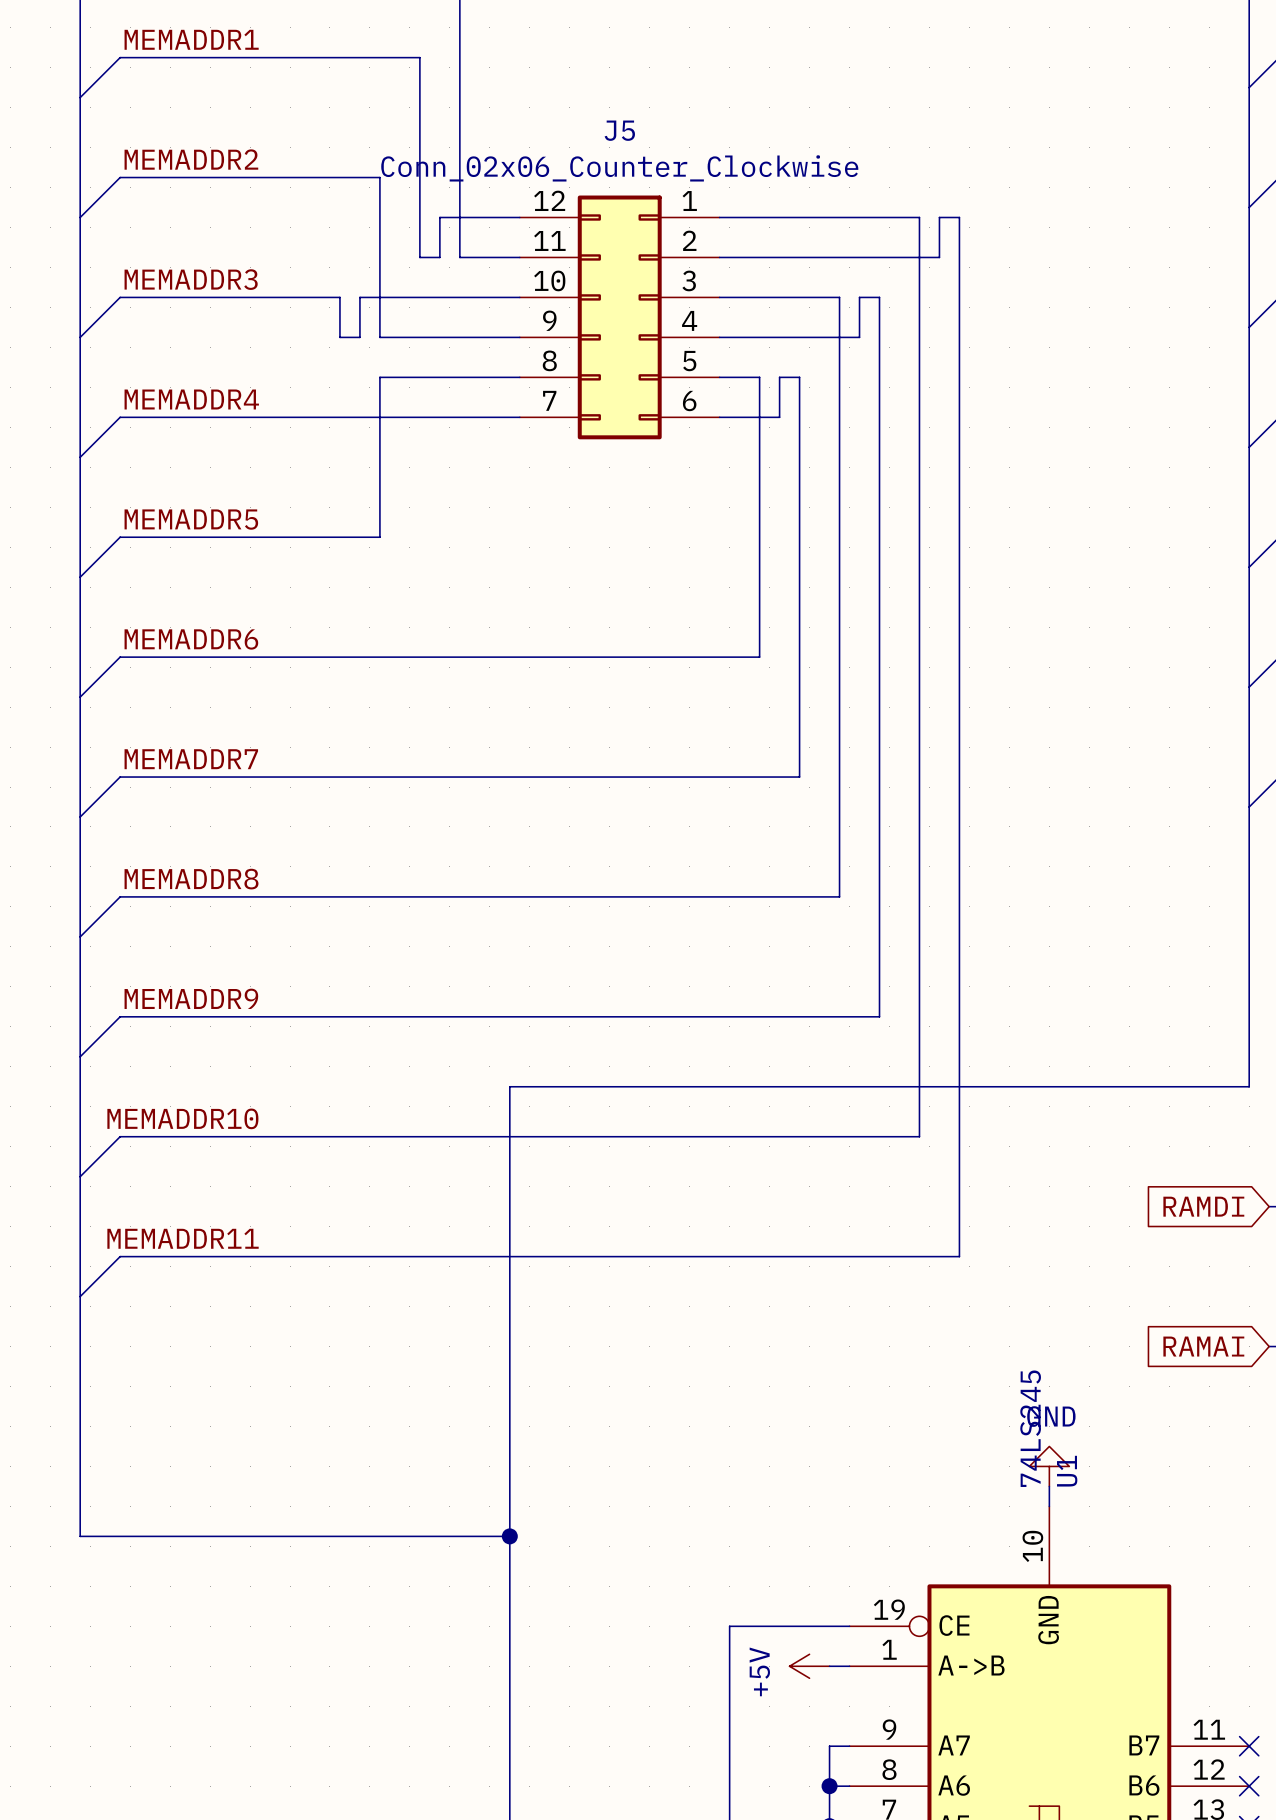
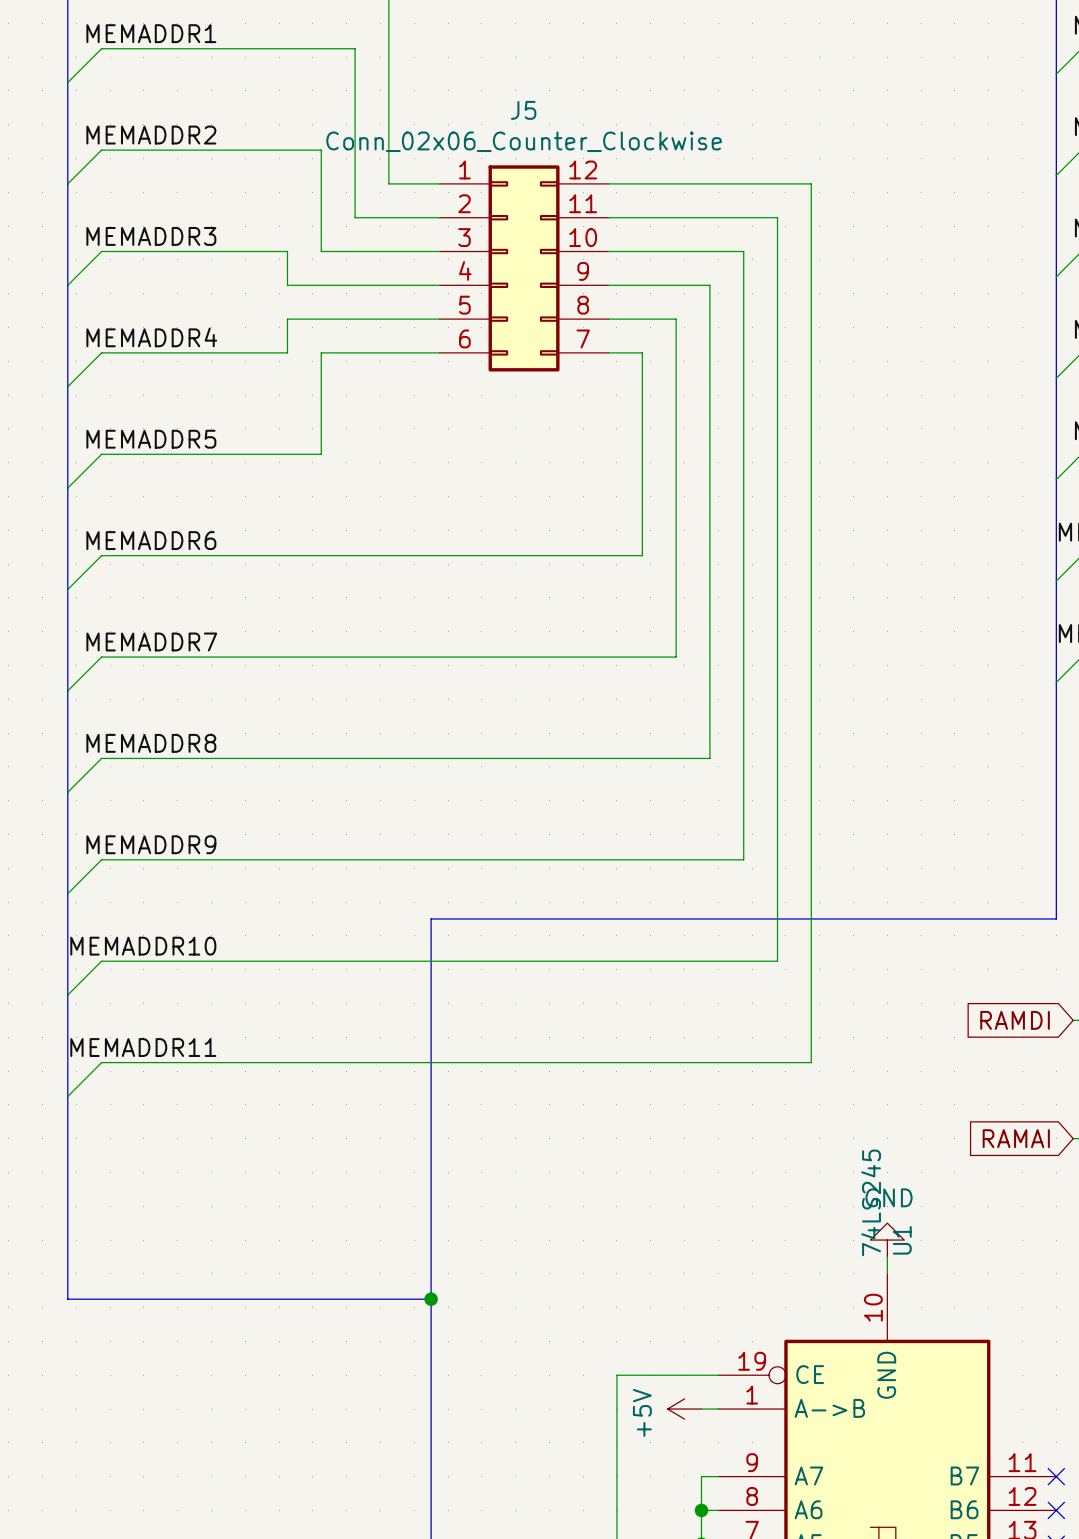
wire: (919, 217) (919, 257) (939, 257) (939, 217) -> (777, 183) (794, 183)
wire: (439, 257) (439, 217) (459, 217) (459, 257) -> (371, 217) (388, 217)
wire: (839, 297) (839, 337) (859, 337) (859, 297) -> (709, 251) (726, 251)
J5 flip: as is (619, 317) -> left-right (524, 268)
wire: (359, 337) (359, 297) (379, 297) (379, 337) -> (304, 285) (321, 285)
wire: (379, 377) (379, 417) (339, 417) -> (321, 319) (287, 319) (287, 352)
wire: (759, 377) (759, 417) (779, 417) (779, 377) -> (642, 319) (659, 319)

